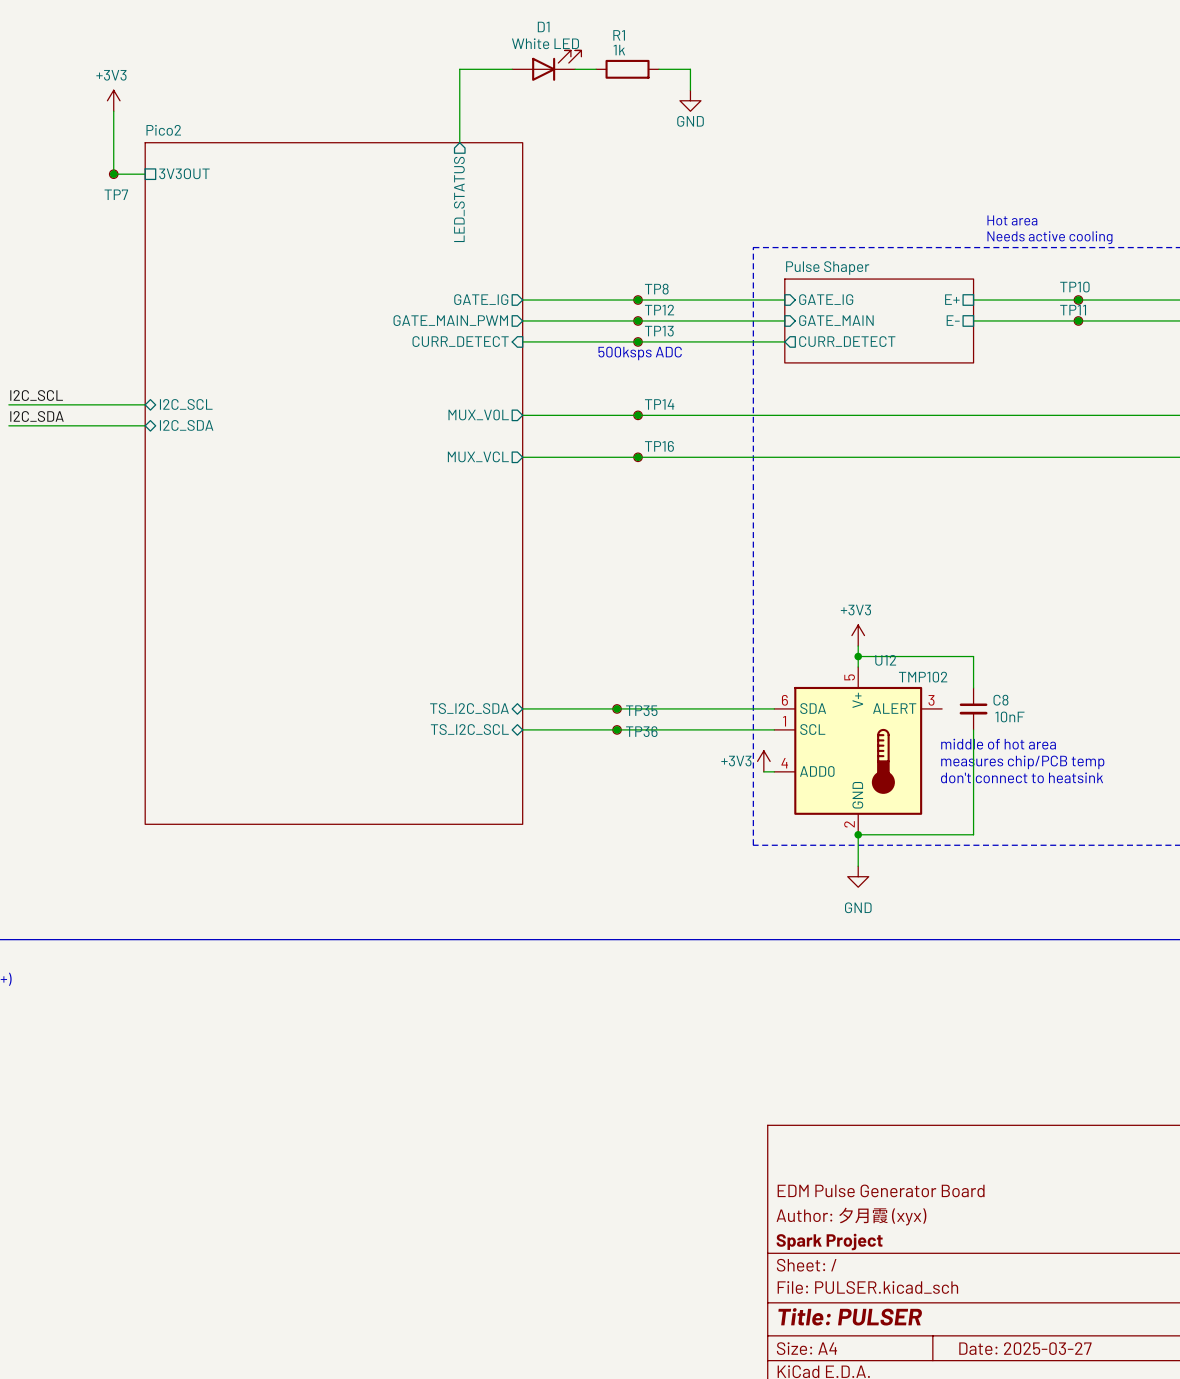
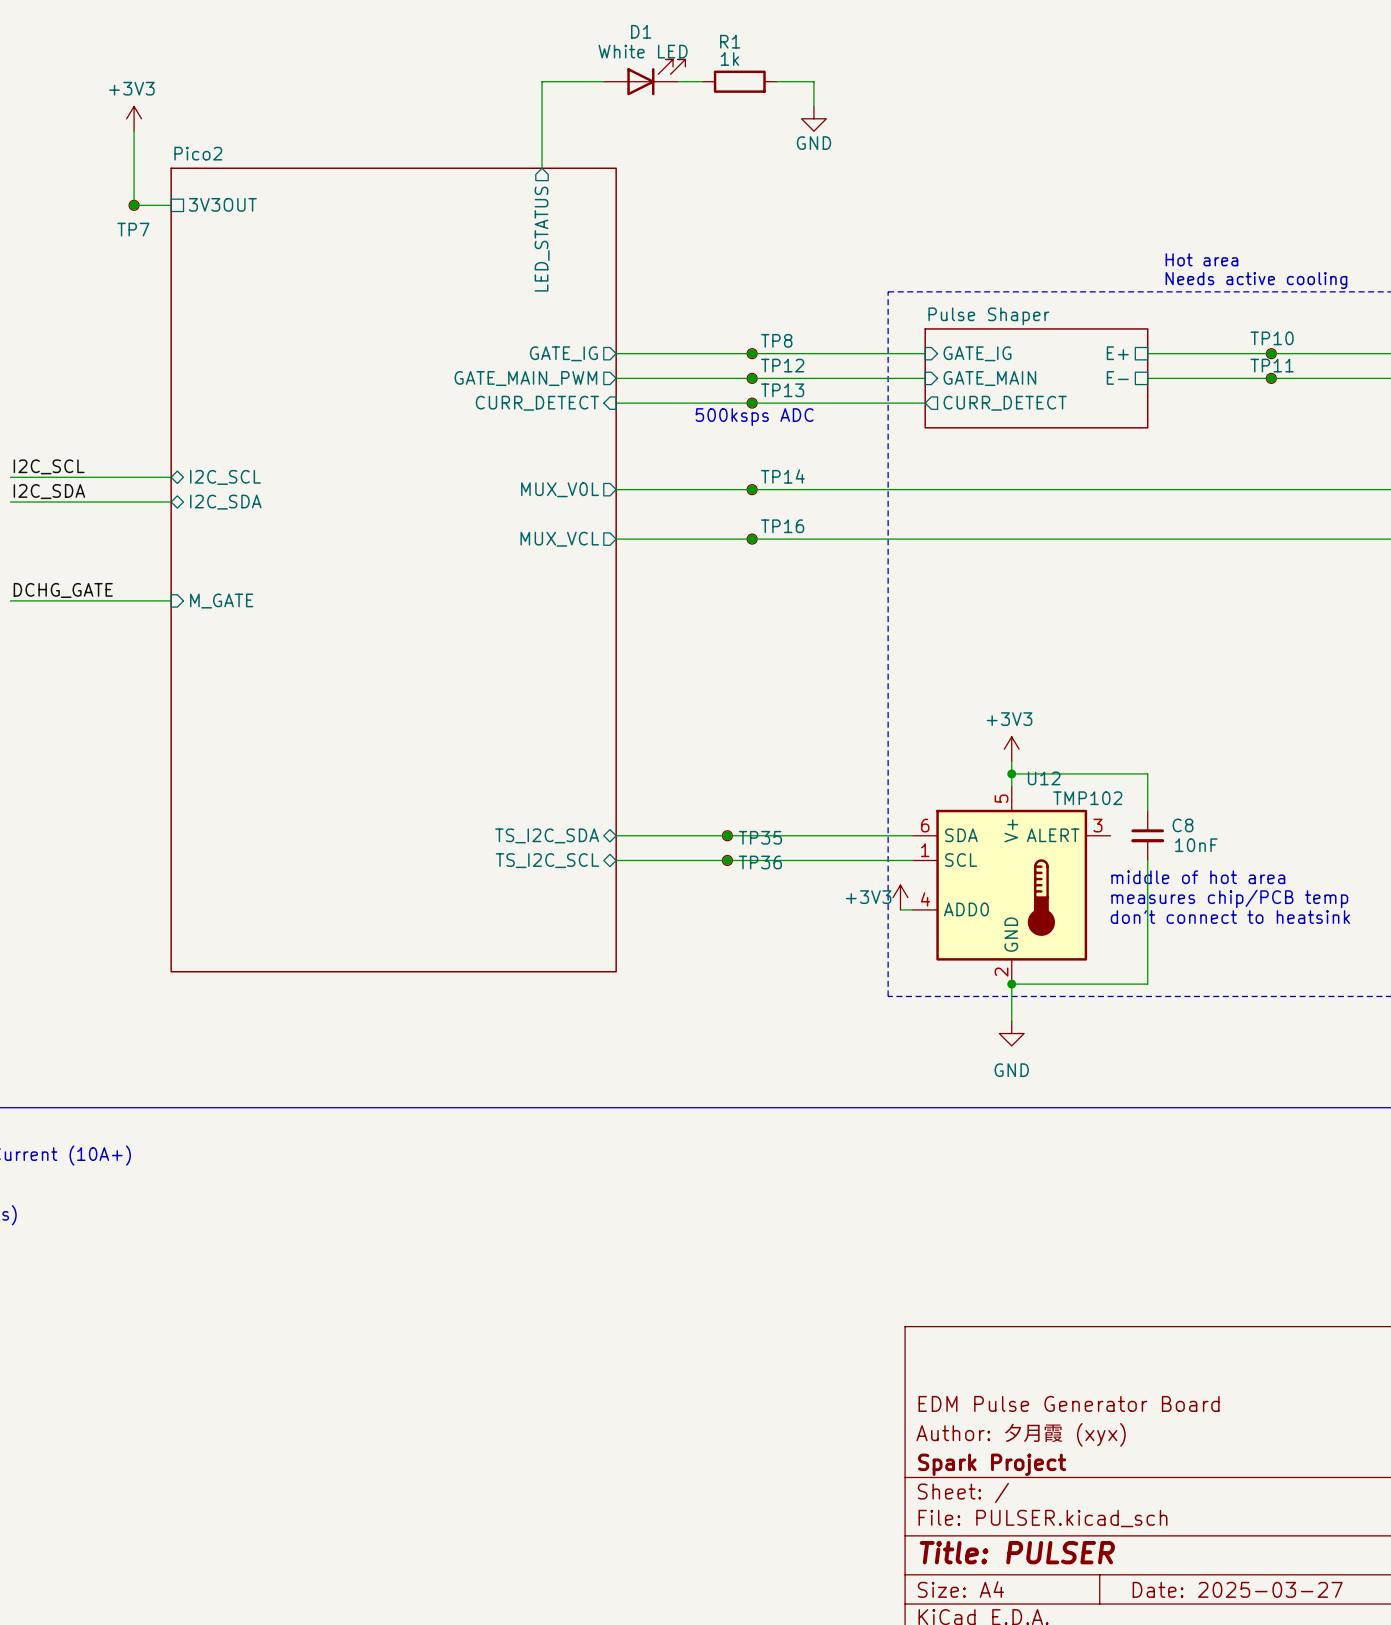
label: none -> DCHG_GATE (63, 590)
wire: none -> (10, 600) (171, 600)
sheet pin: none -> M_GATE (221, 601)

